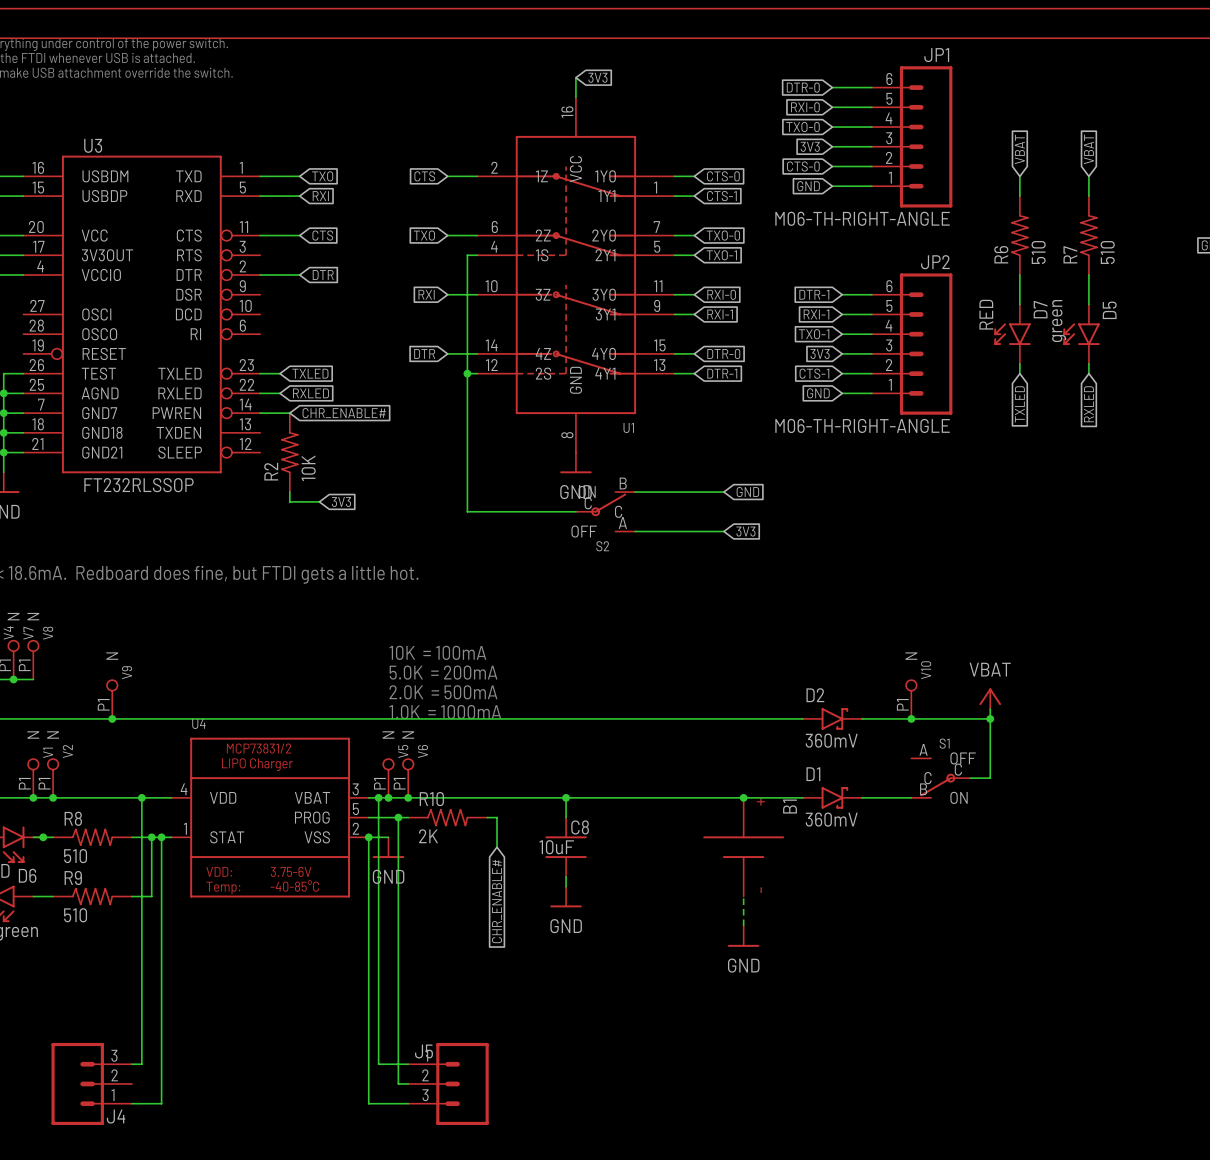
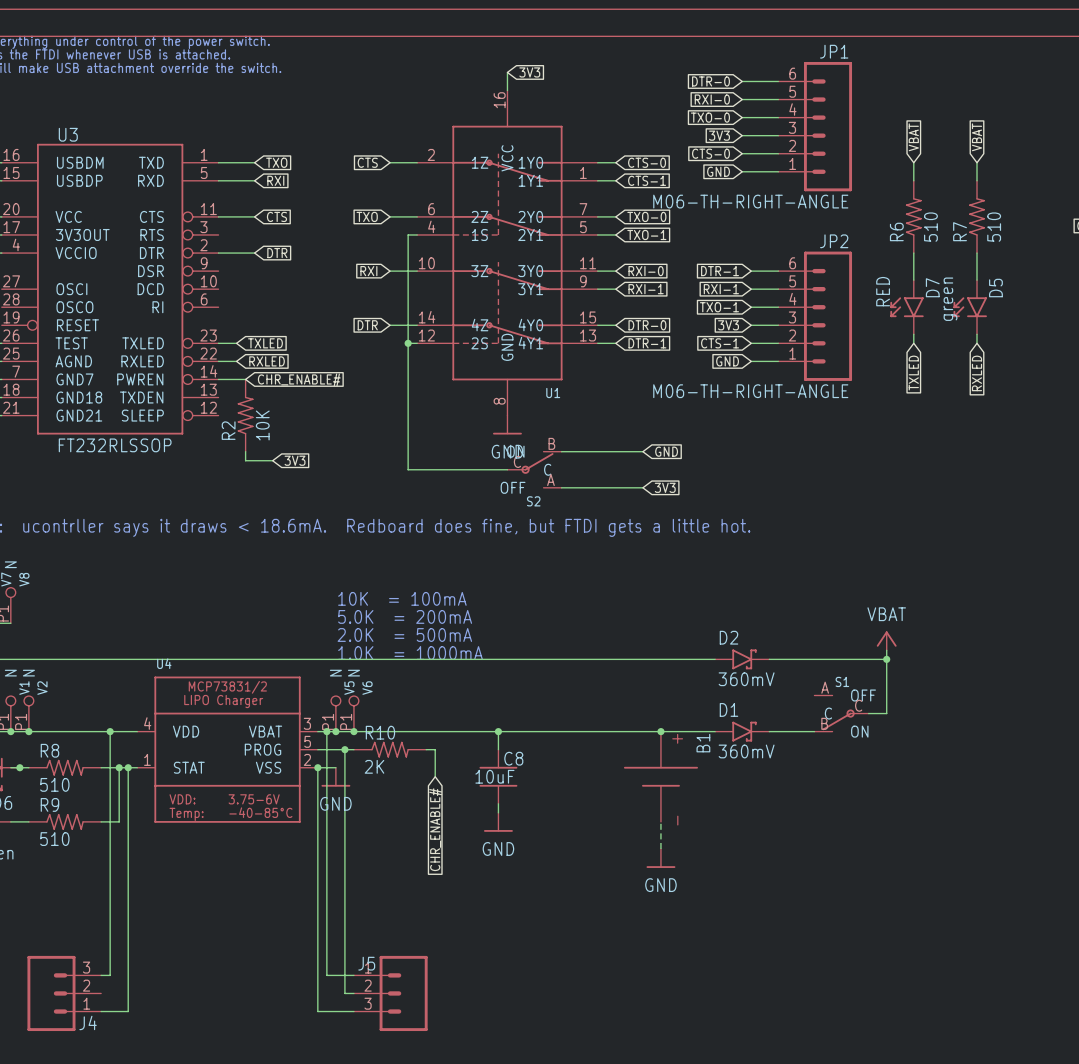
V9: (112, 699) -> none
V10: (911, 699) -> none
junction: (112, 718) -> none
junction: (911, 718) -> none

